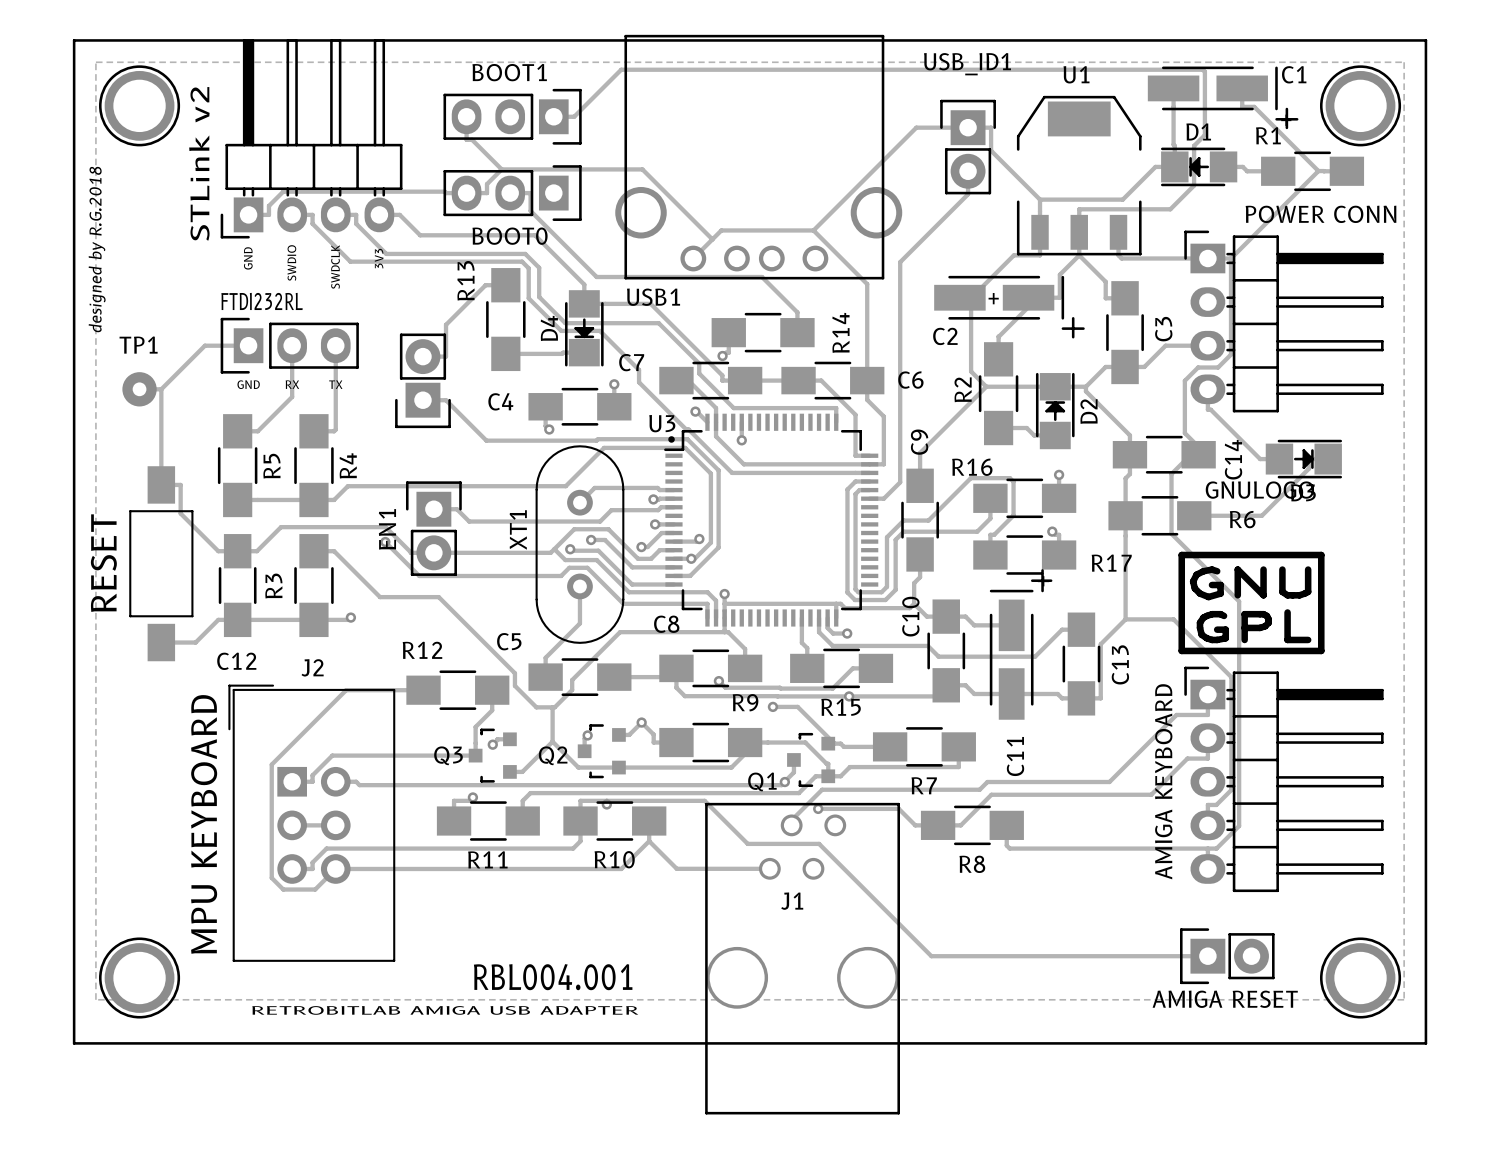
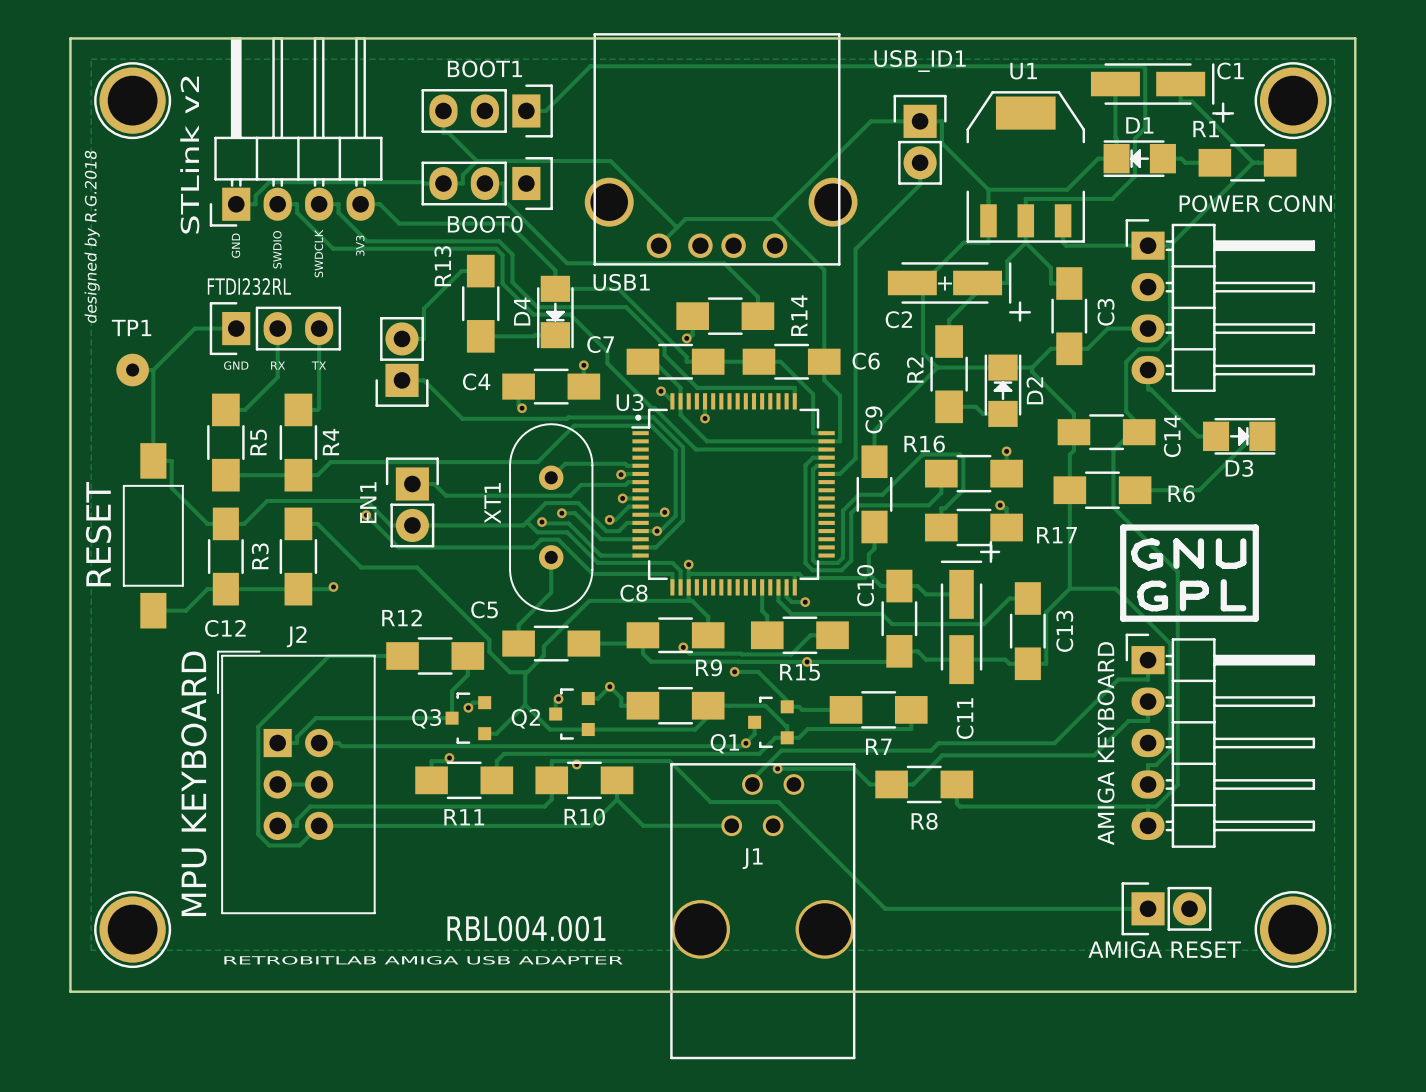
GNULOGO: (1251, 602) -> none

